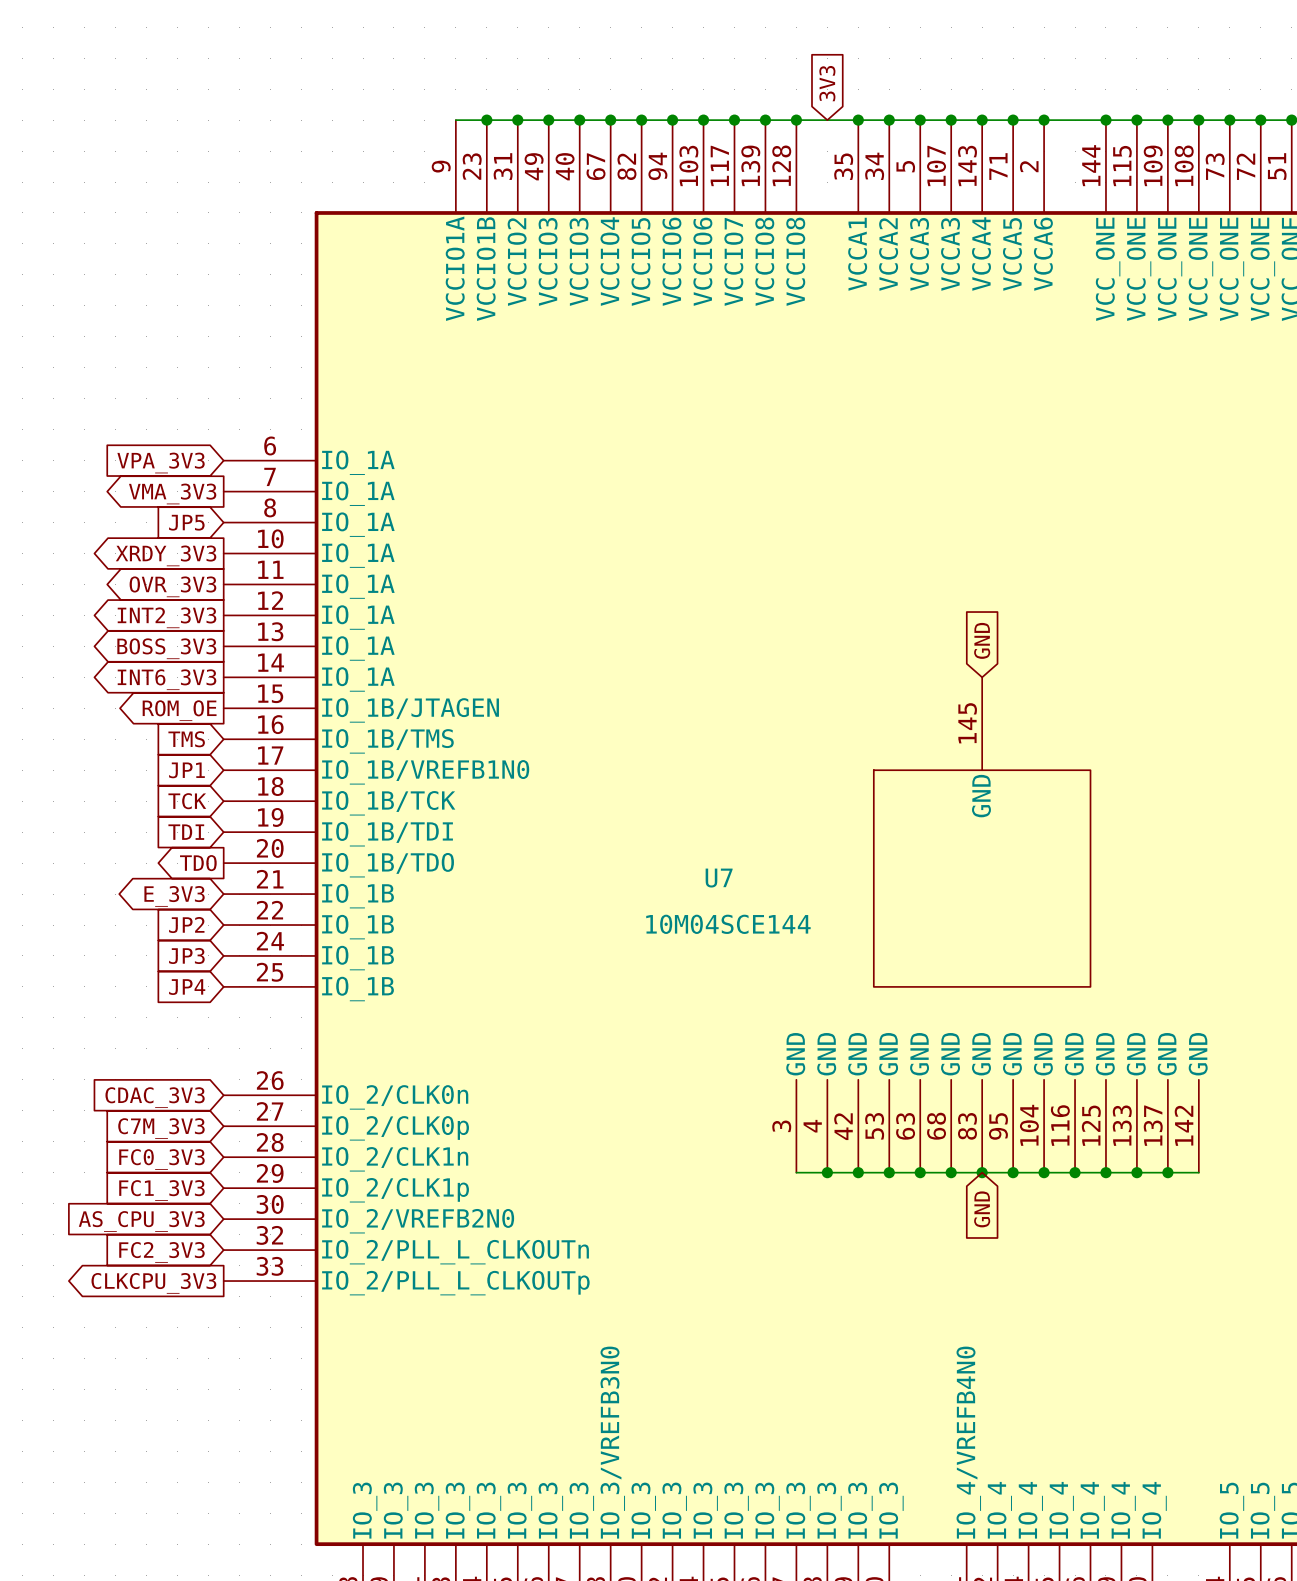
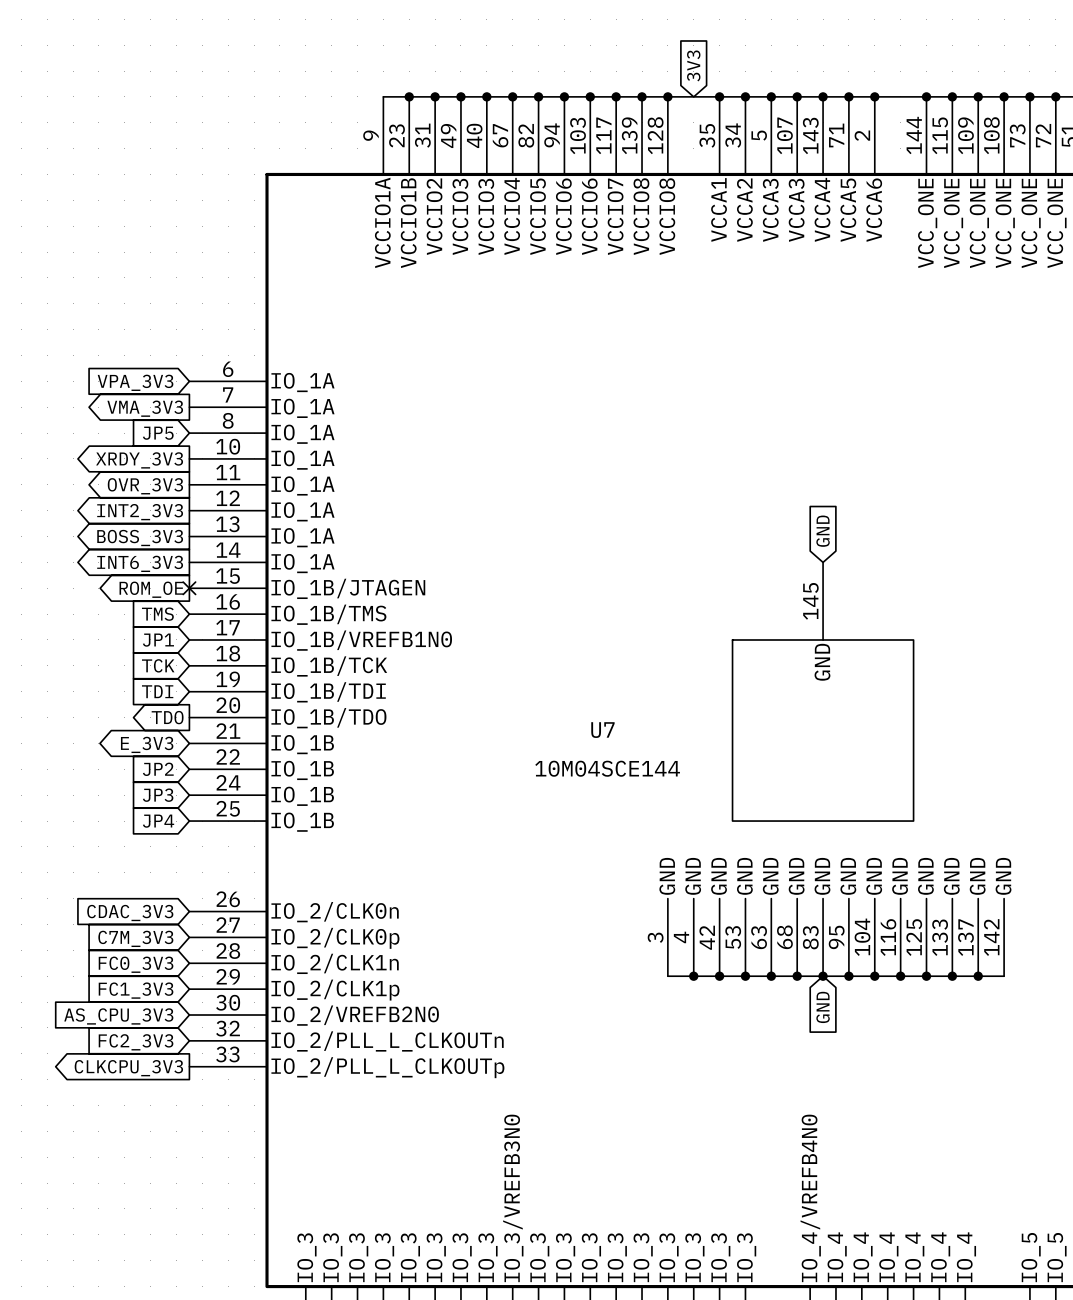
no-connect mark: none -> (189, 588)

